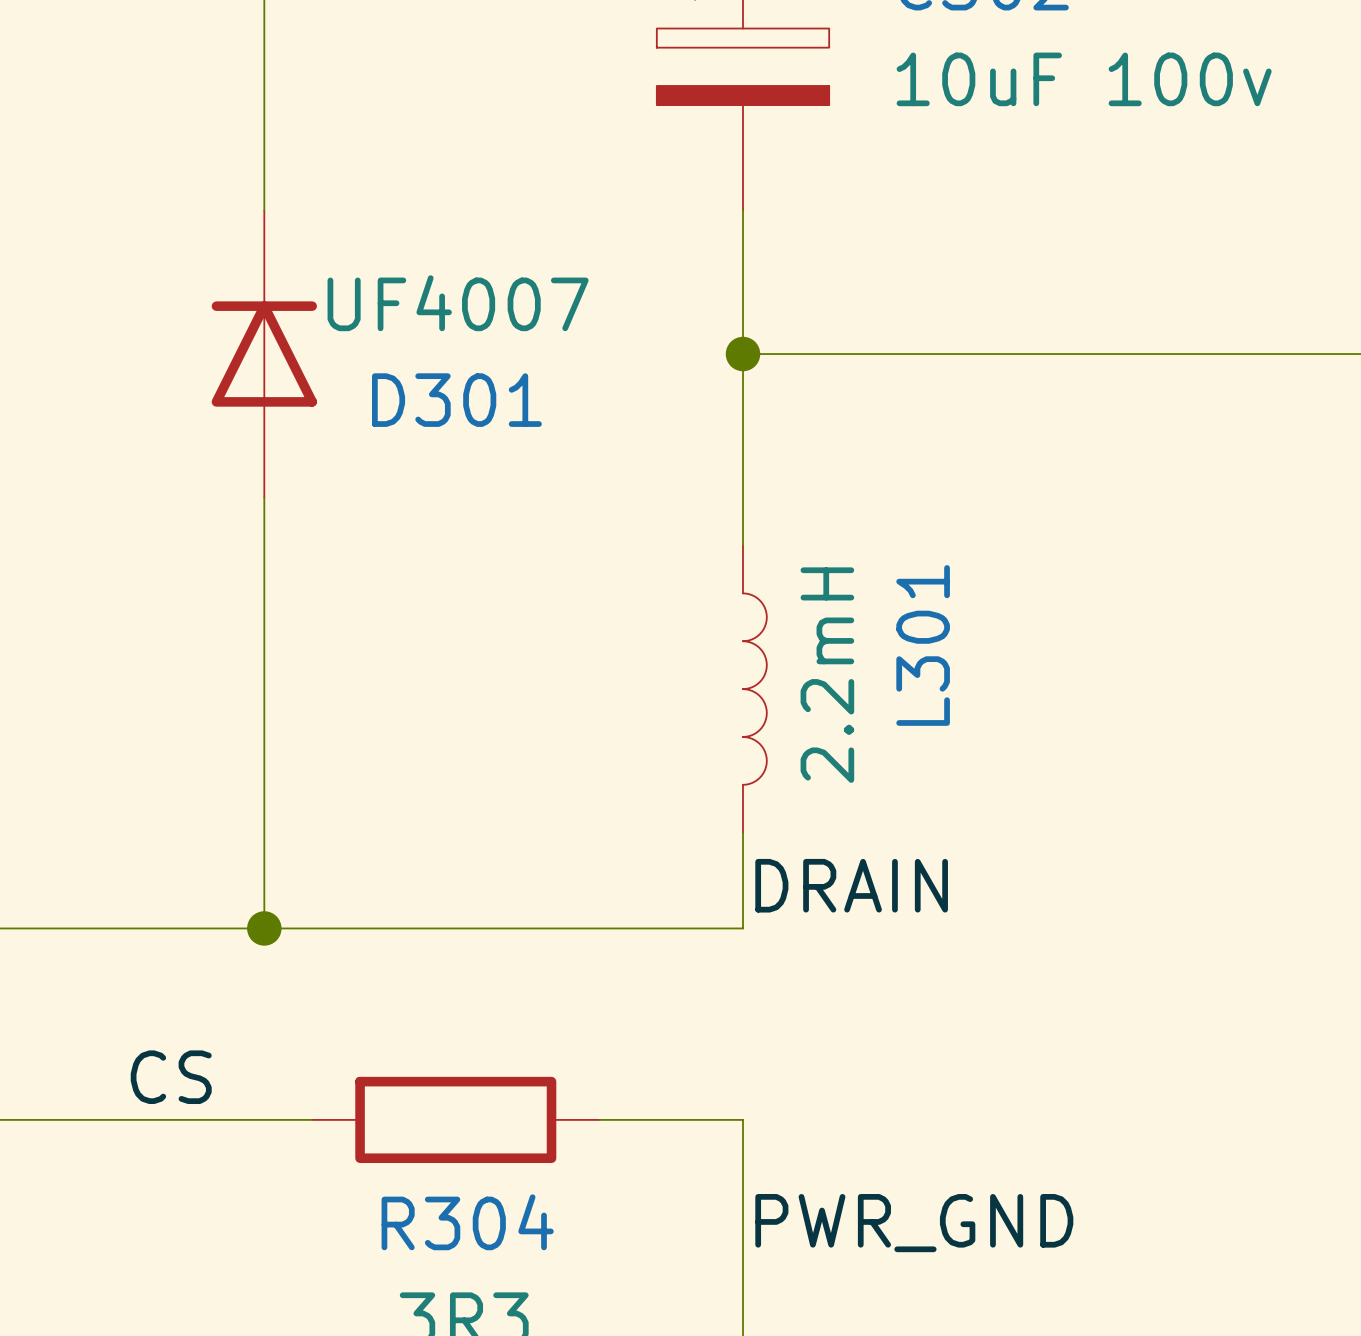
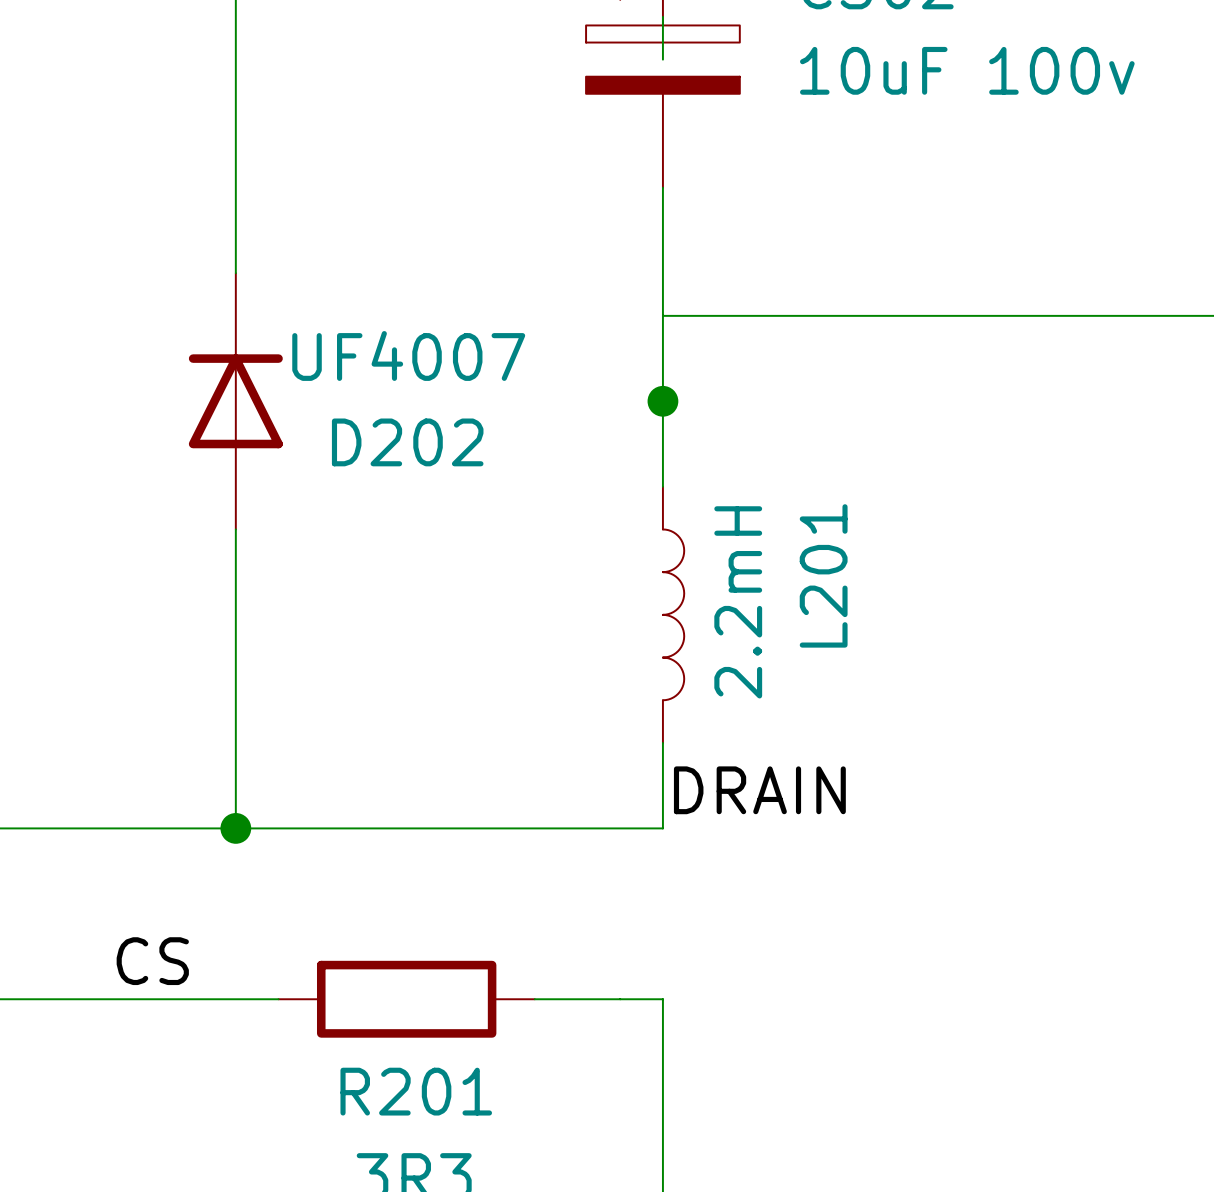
wire: none -> (662, 16) (662, 59)
D301: UF4007 (264, 354) -> none
junction position: (743, 354) -> (662, 401)
D202: none -> UF4007 (235, 401)
L301 name: L301 (923, 645) -> L201 (823, 575)
R304 name: R304 (467, 1222) -> R201 (416, 1091)
label: PWR_GND (914, 1223) -> none

